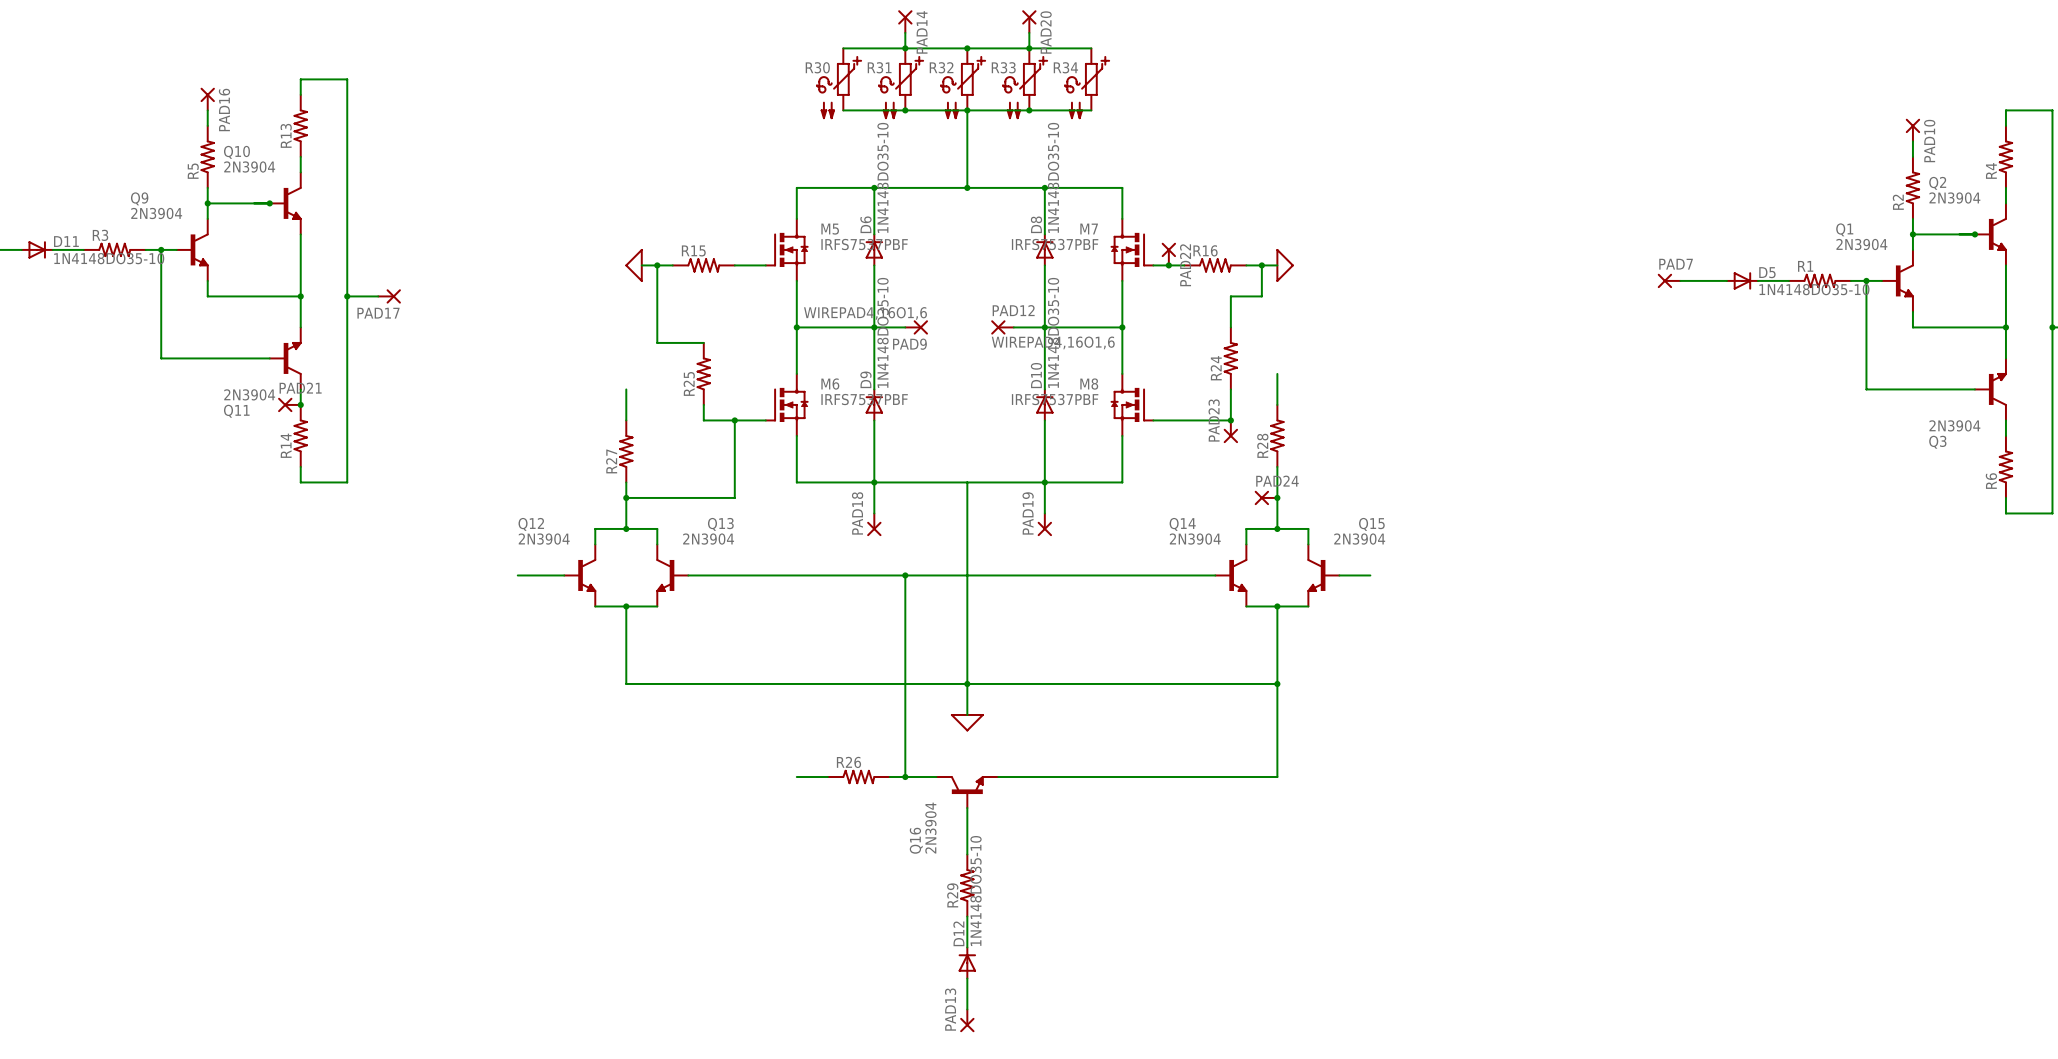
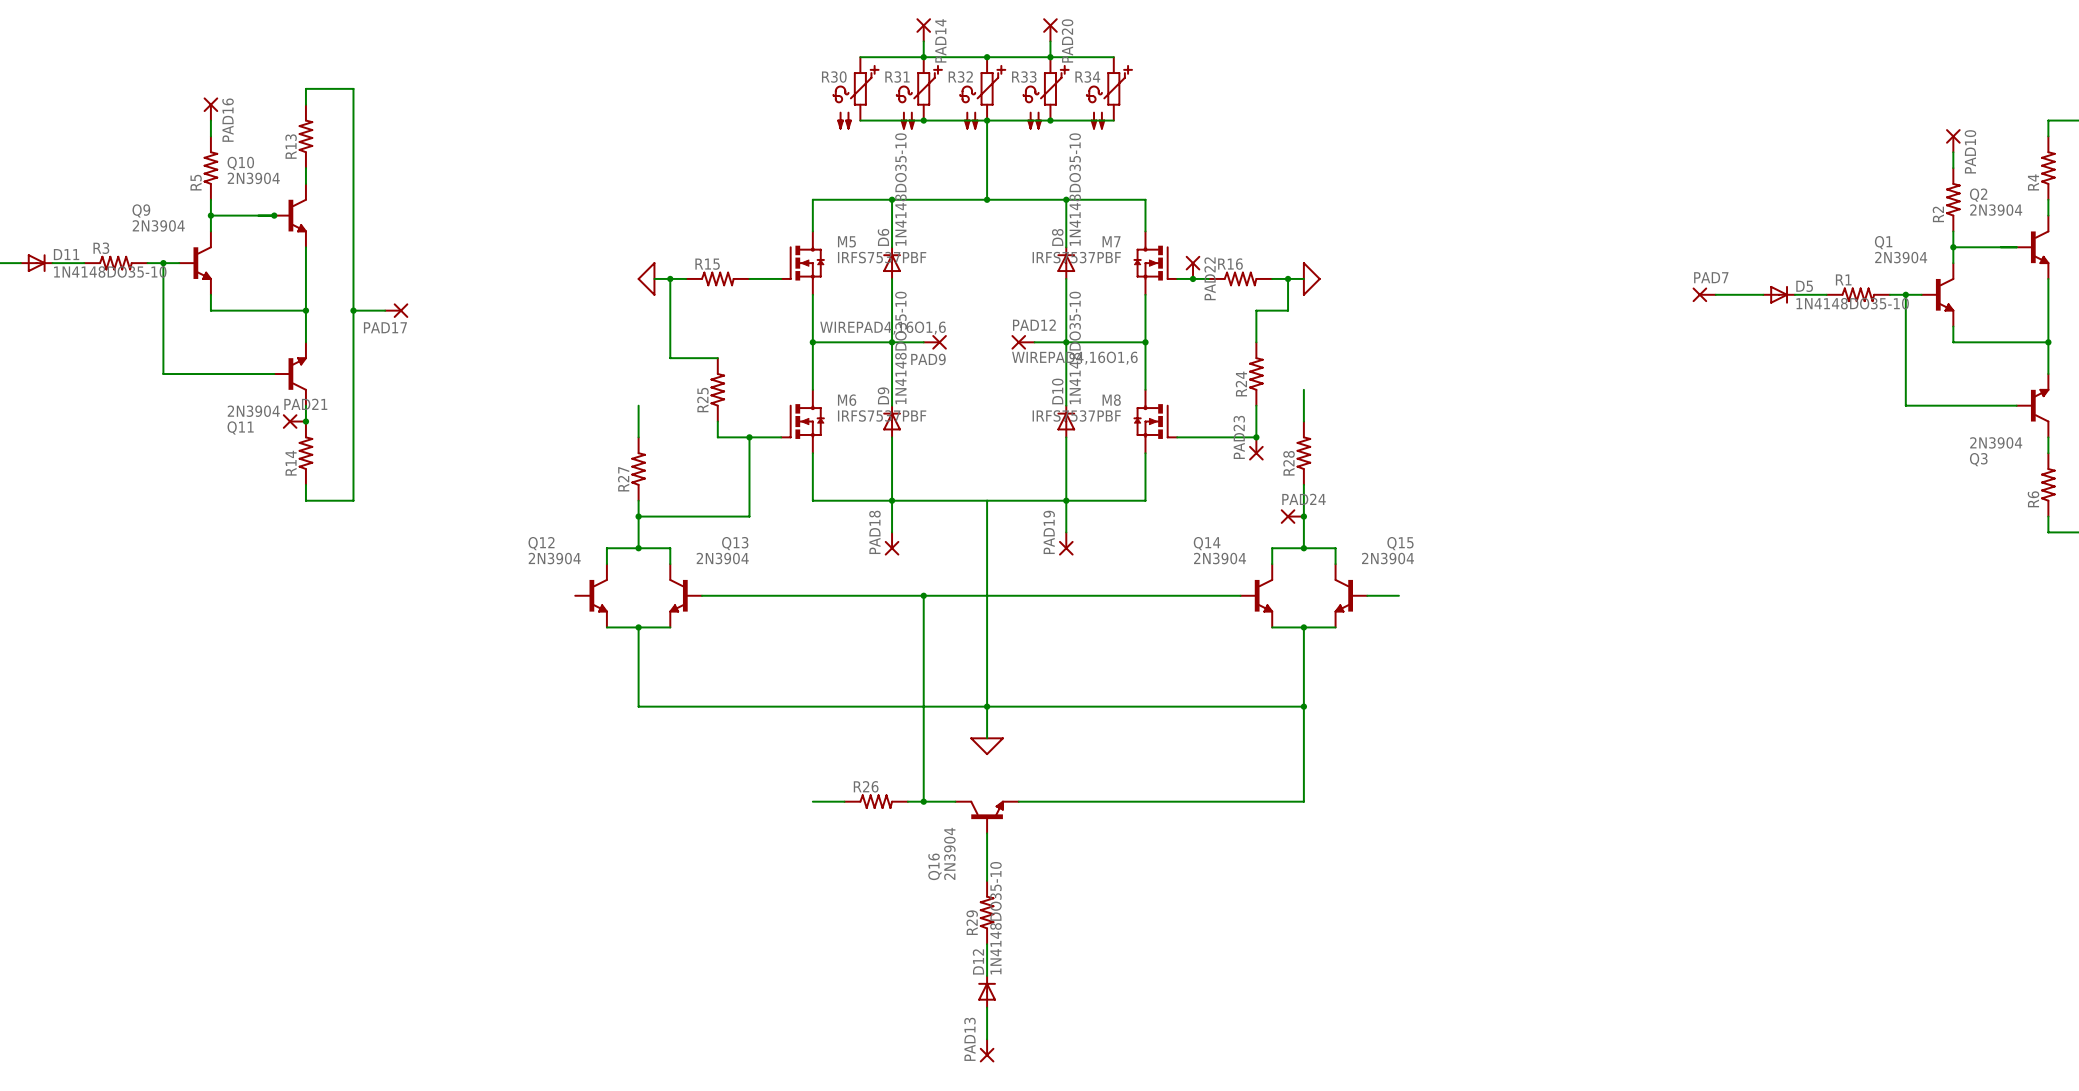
junction: (1974, 234) -> none
wire: (517, 575) (564, 575) -> none

